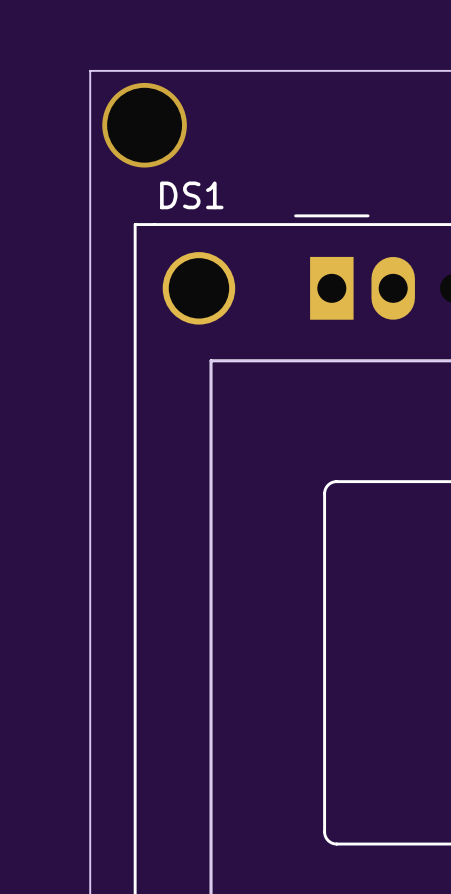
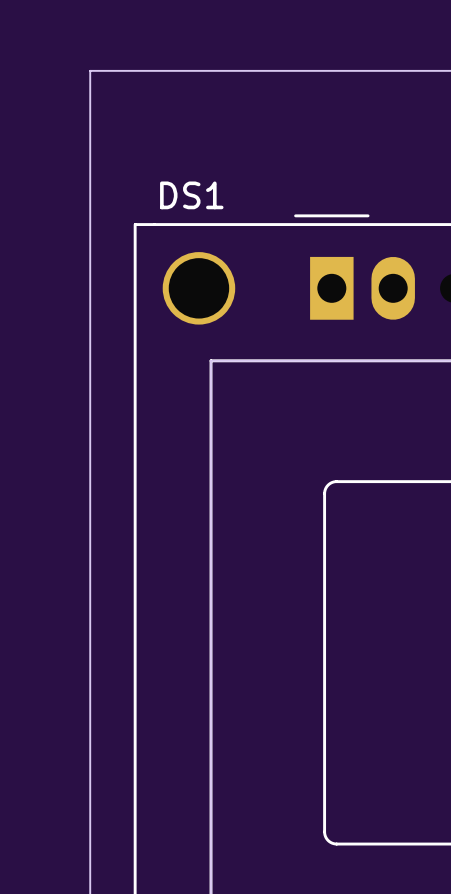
via: (144, 125) -> none

